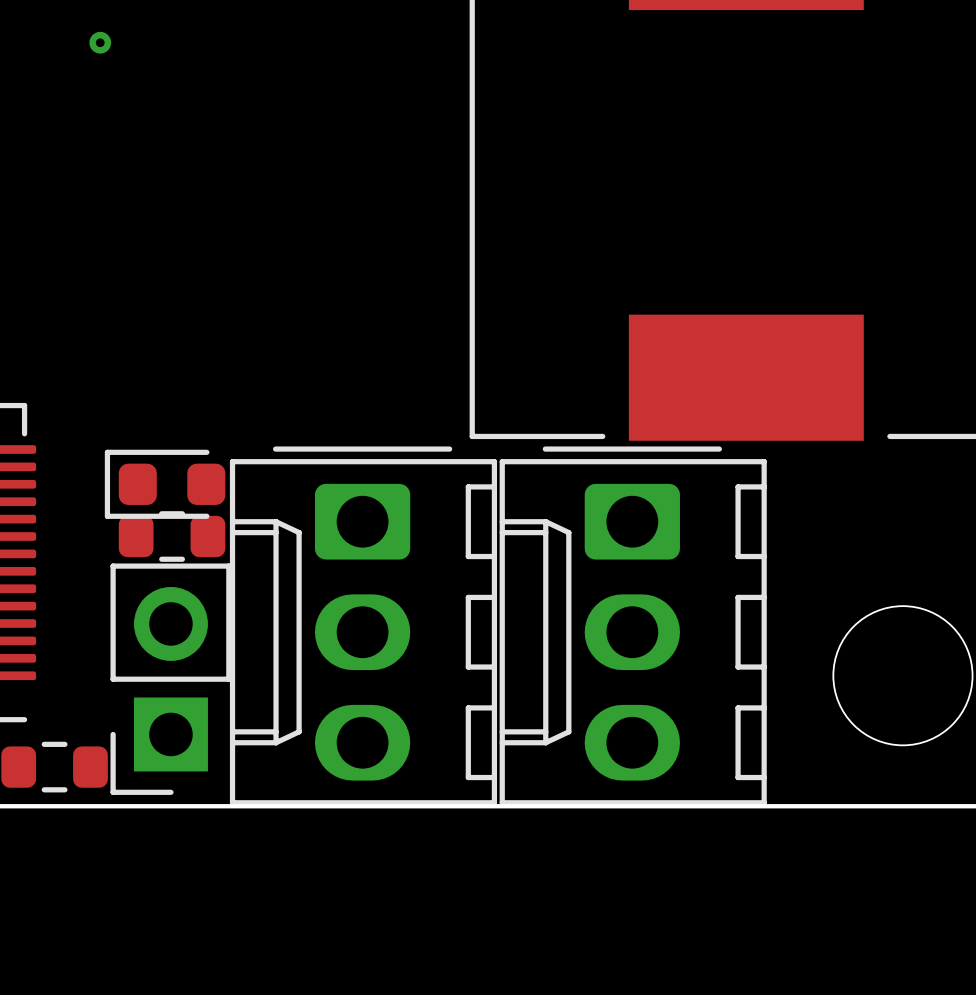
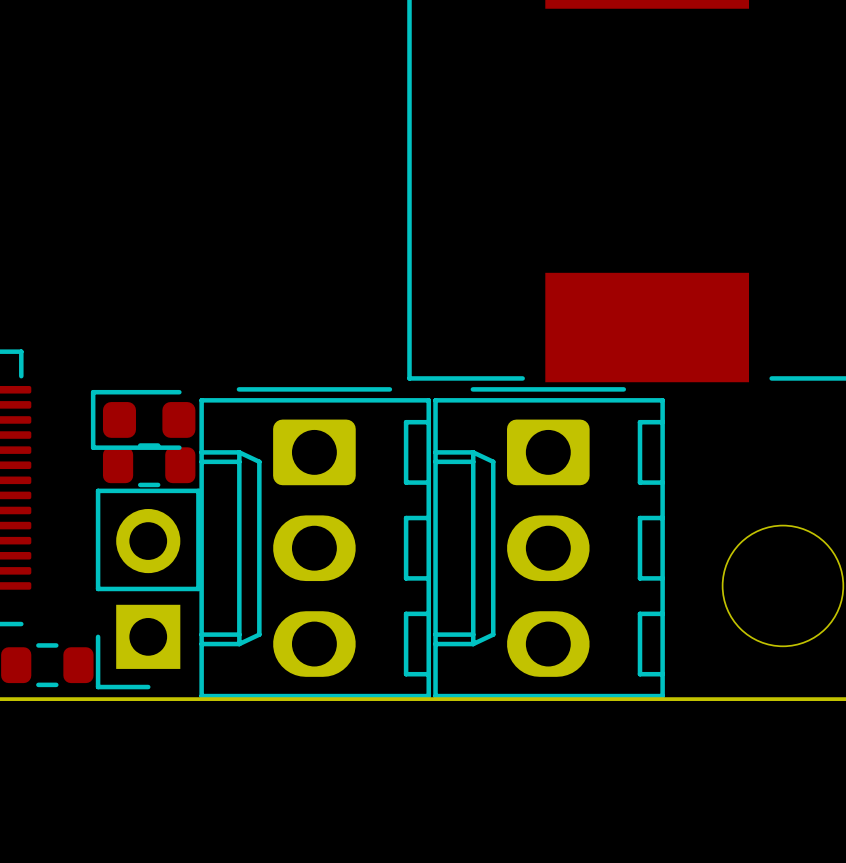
via: (100, 42) -> none

